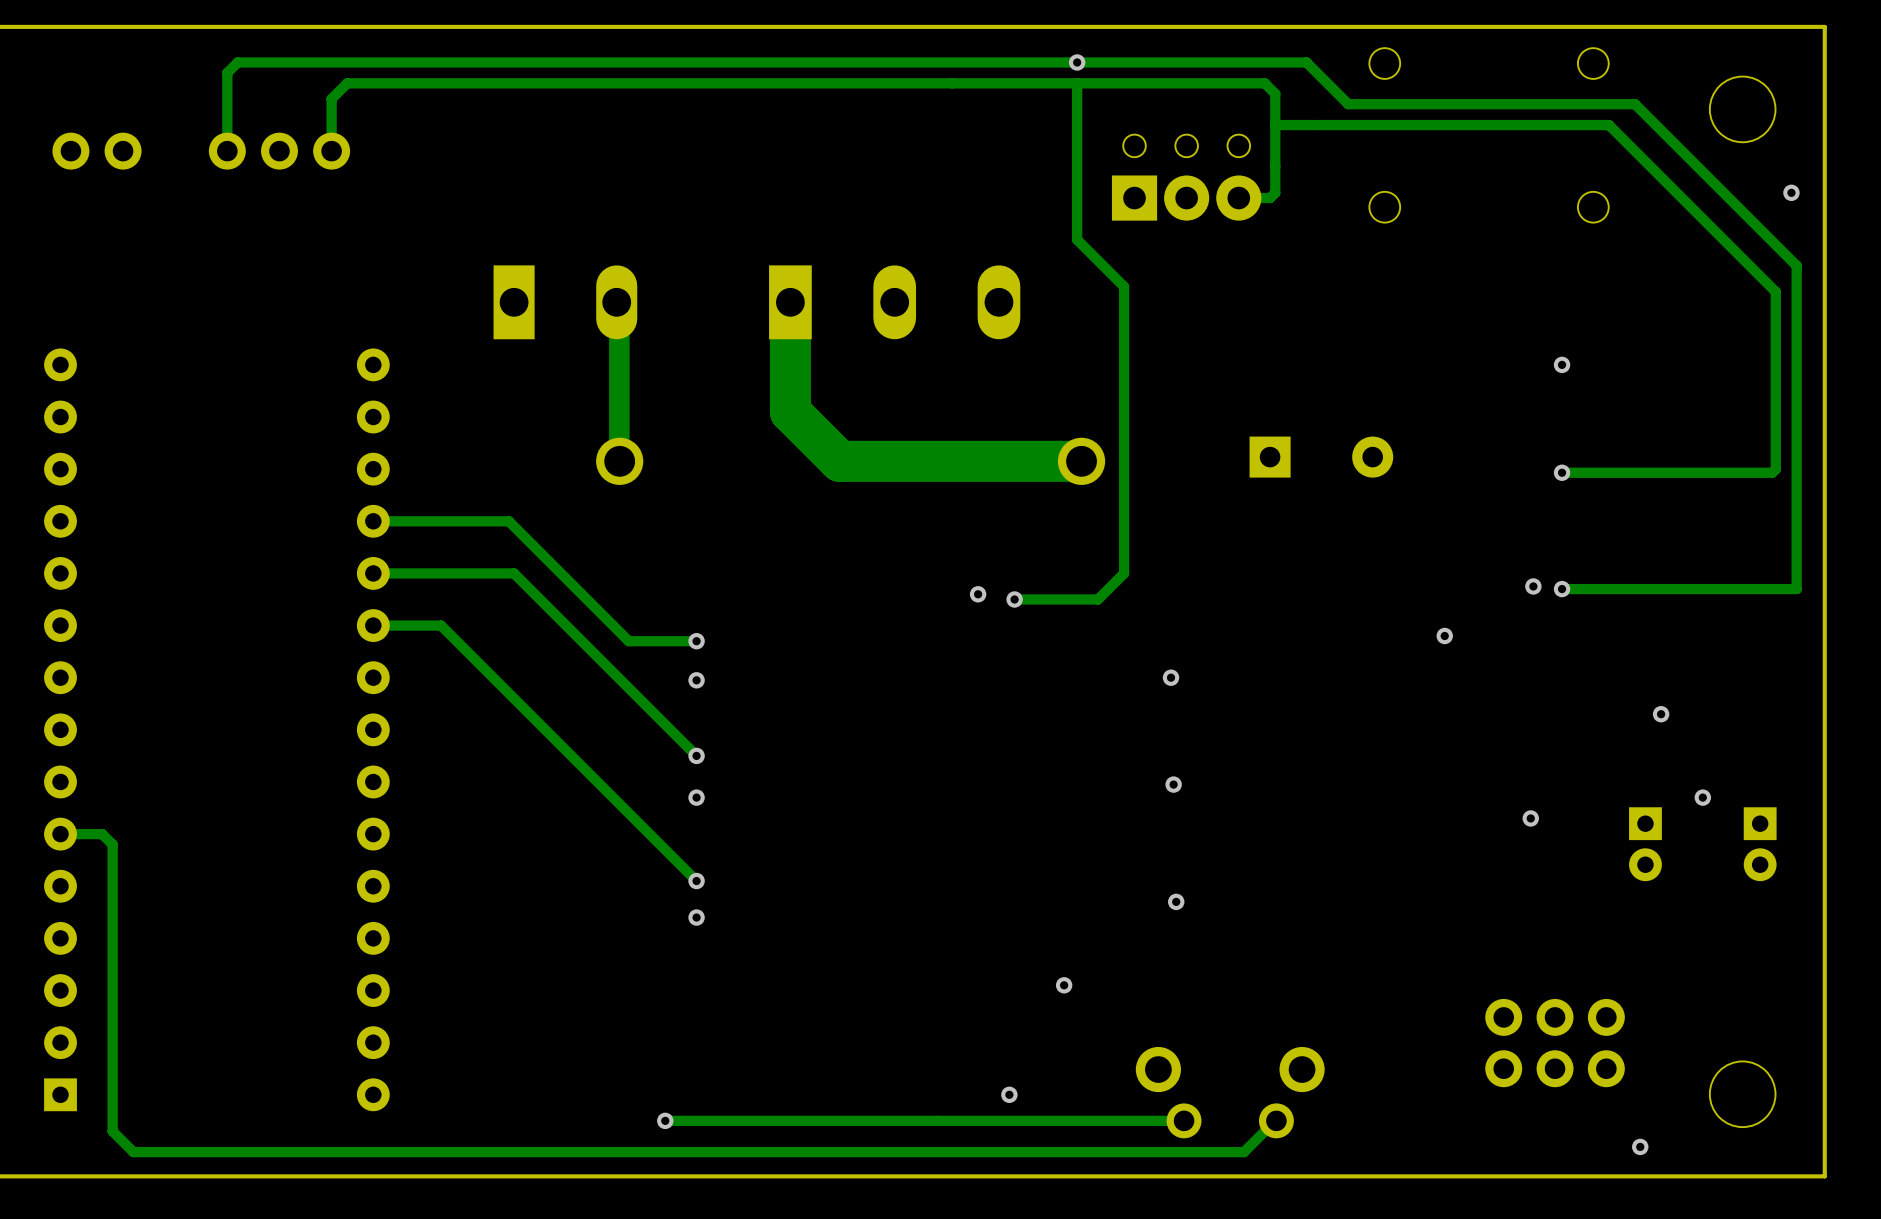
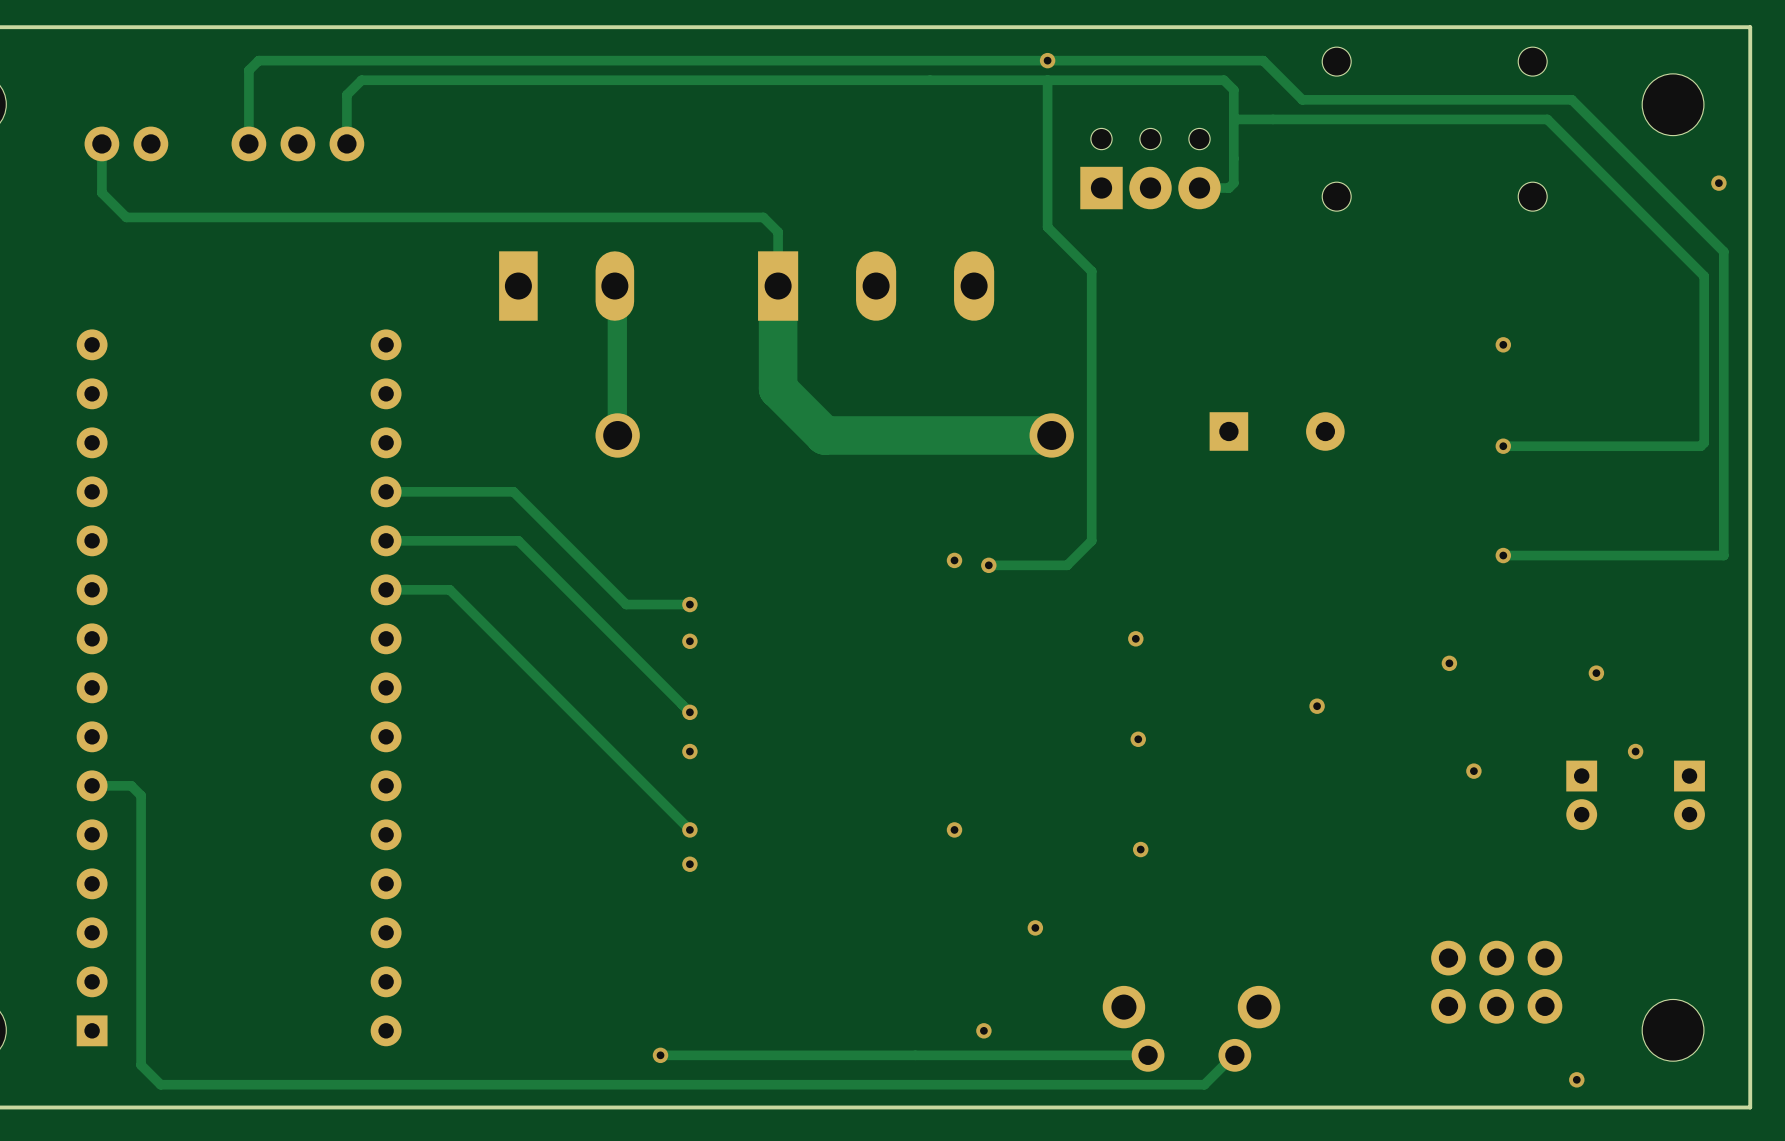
track: none -> (101, 156) (101, 192) (126, 217) (763, 217) (778, 232) (778, 288)
via: (1533, 586) -> none
via: (1444, 635) -> none
via: none -> (1449, 663)
via: none -> (1317, 706)
via: none -> (954, 829)

